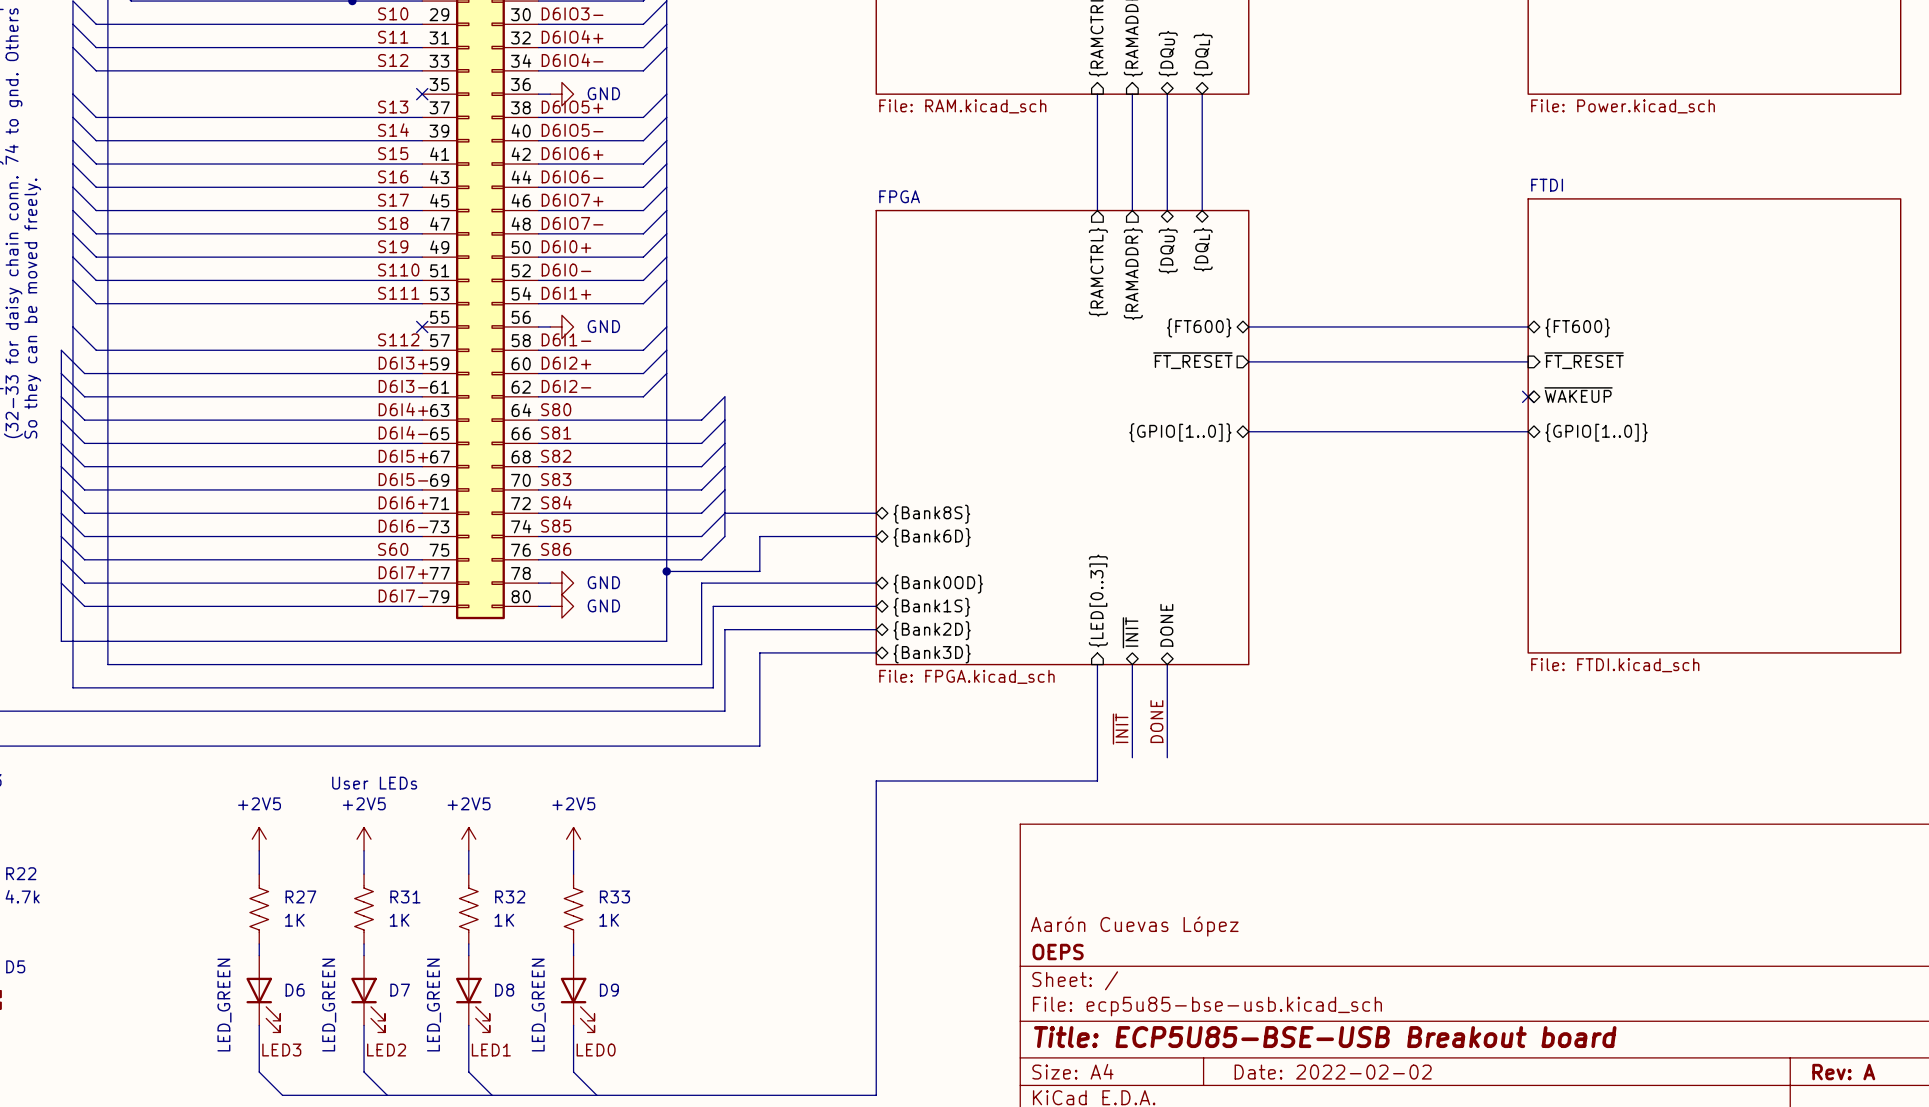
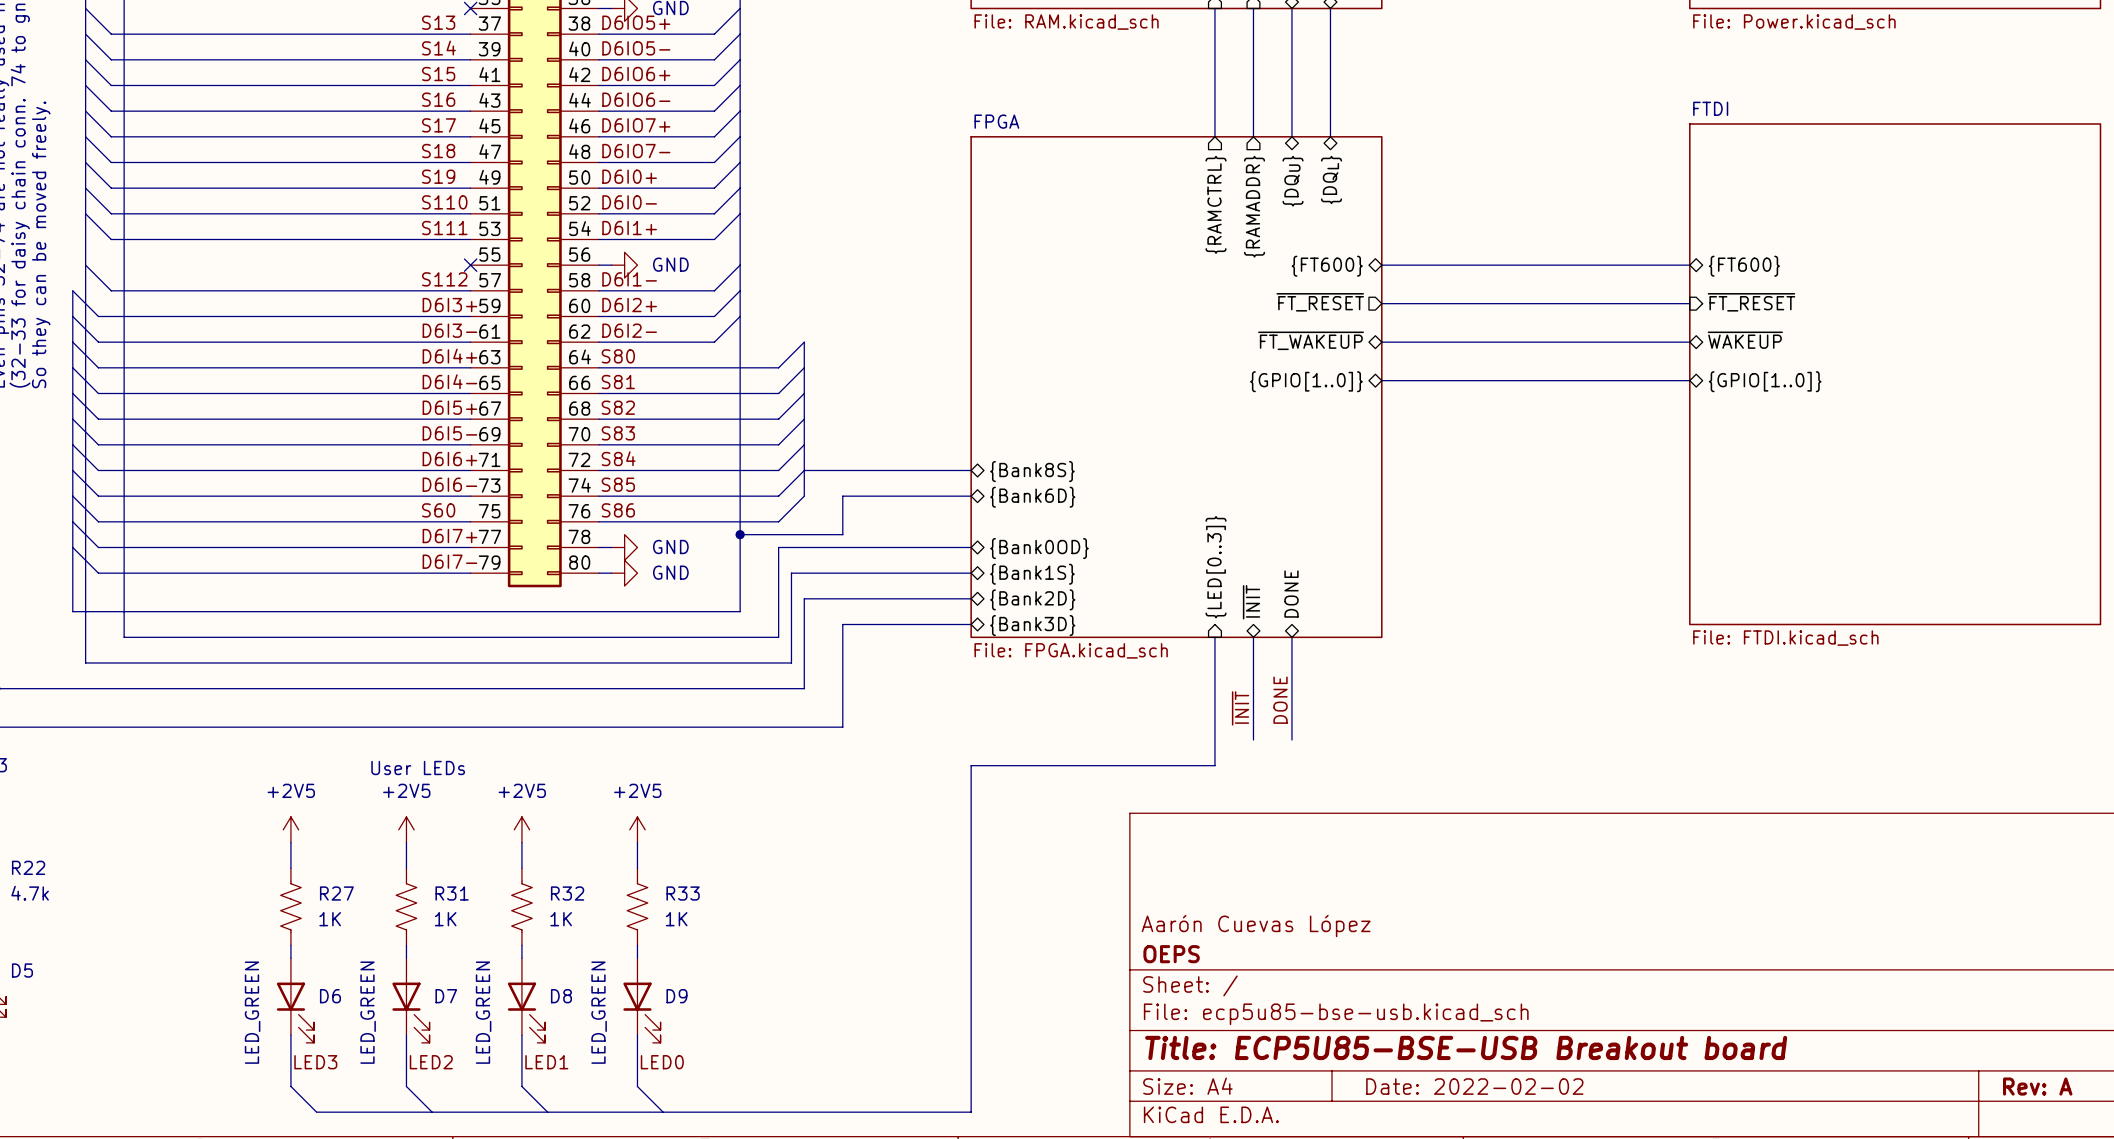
sheet pin: none -> ~{FT_WAKEUP} (1311, 340)
wire: none -> (1381, 342) (1689, 342)
no-connect mark: (1528, 396) -> none

